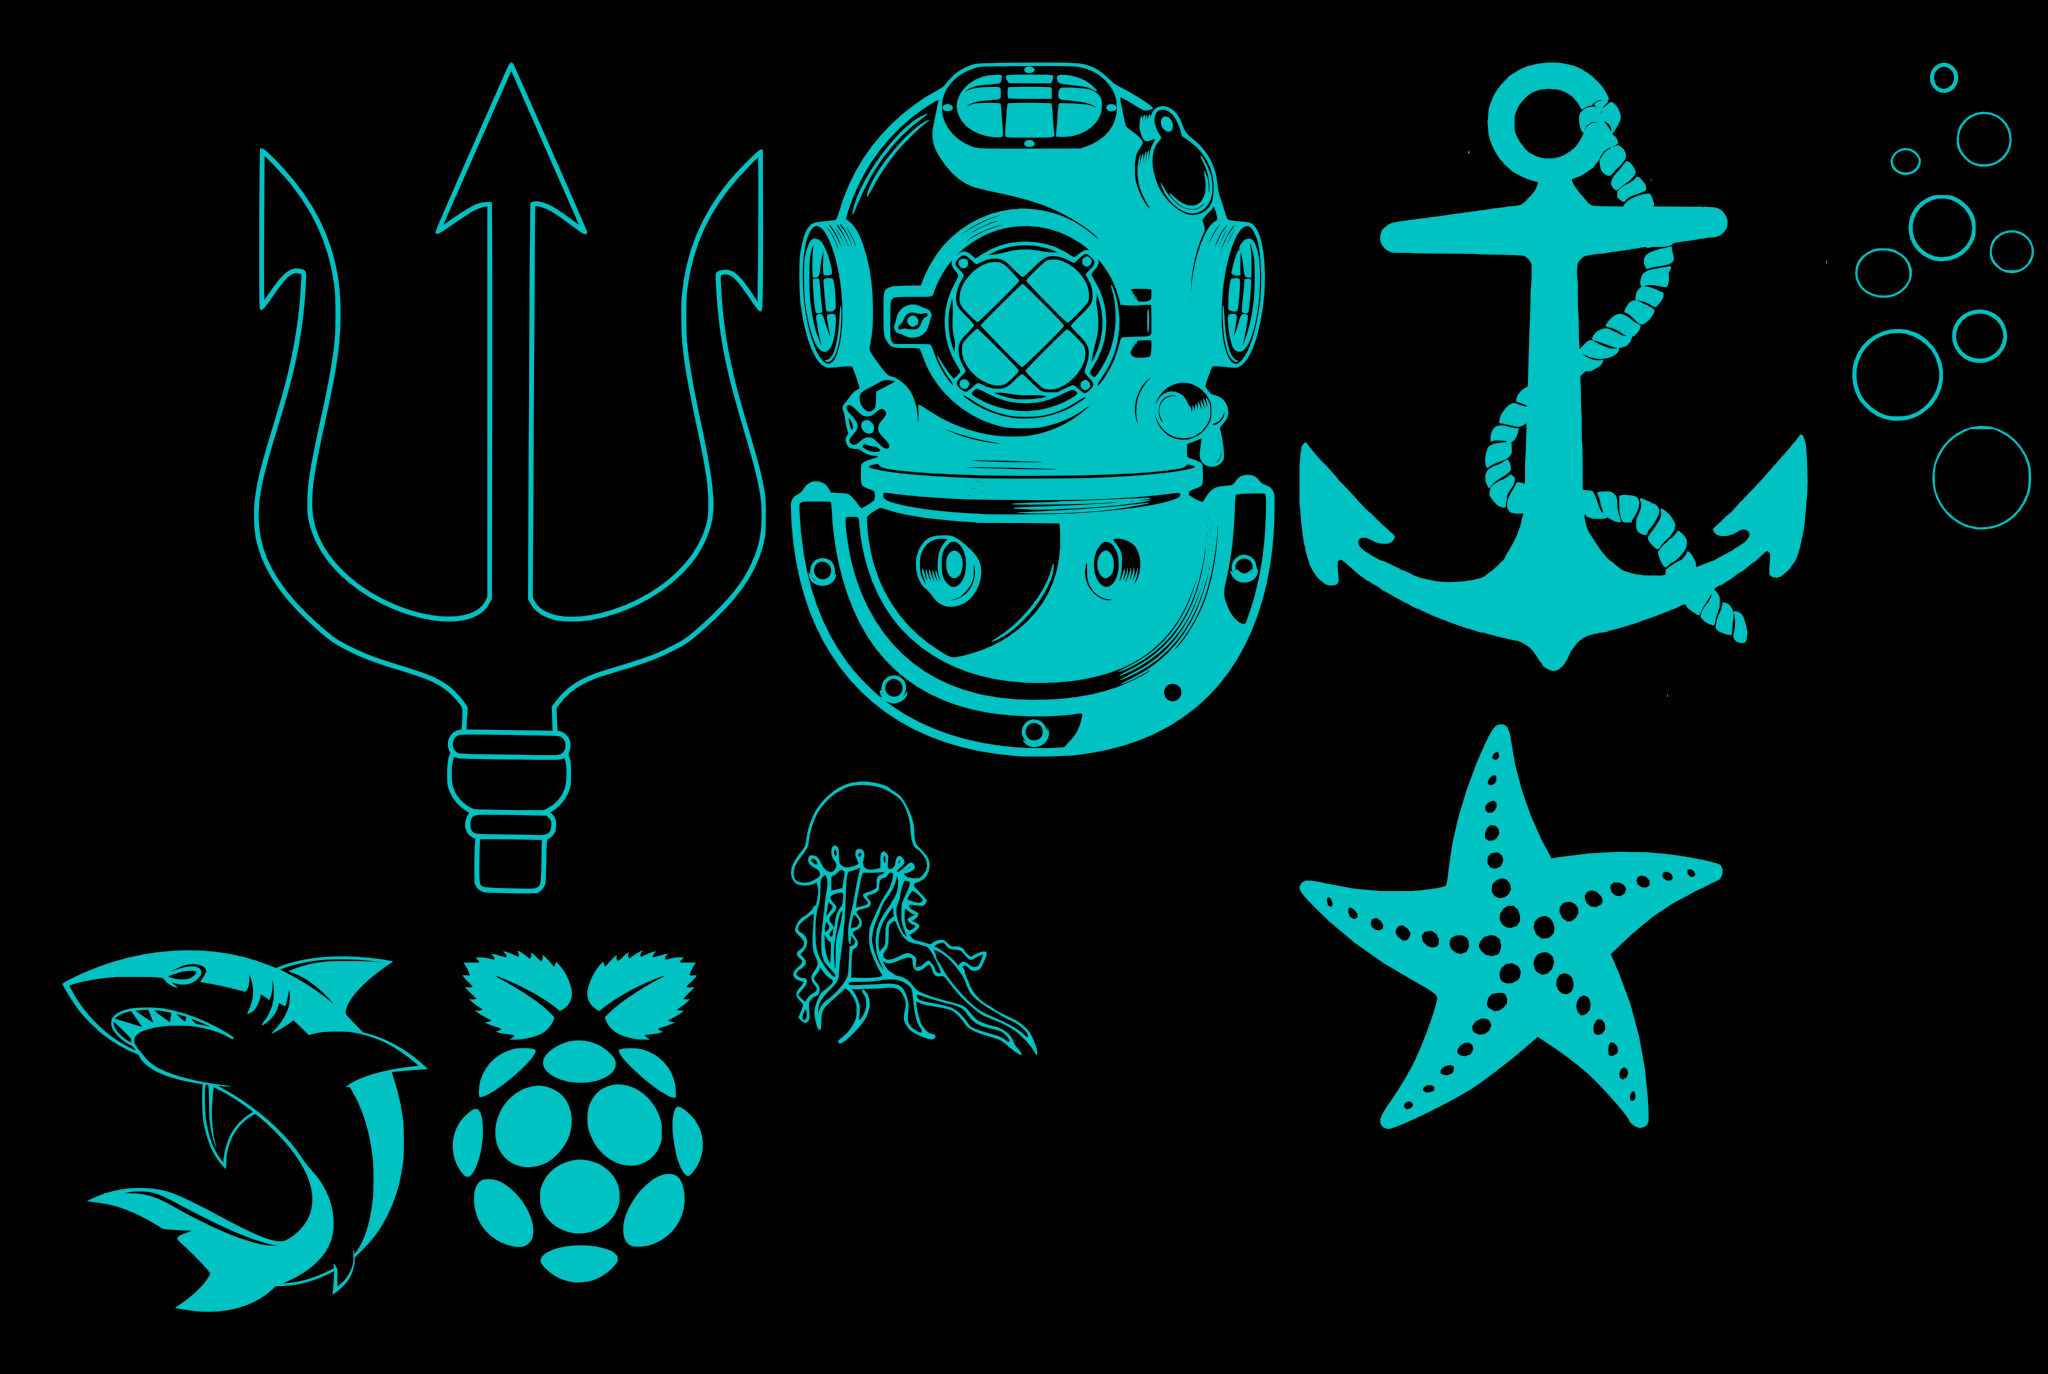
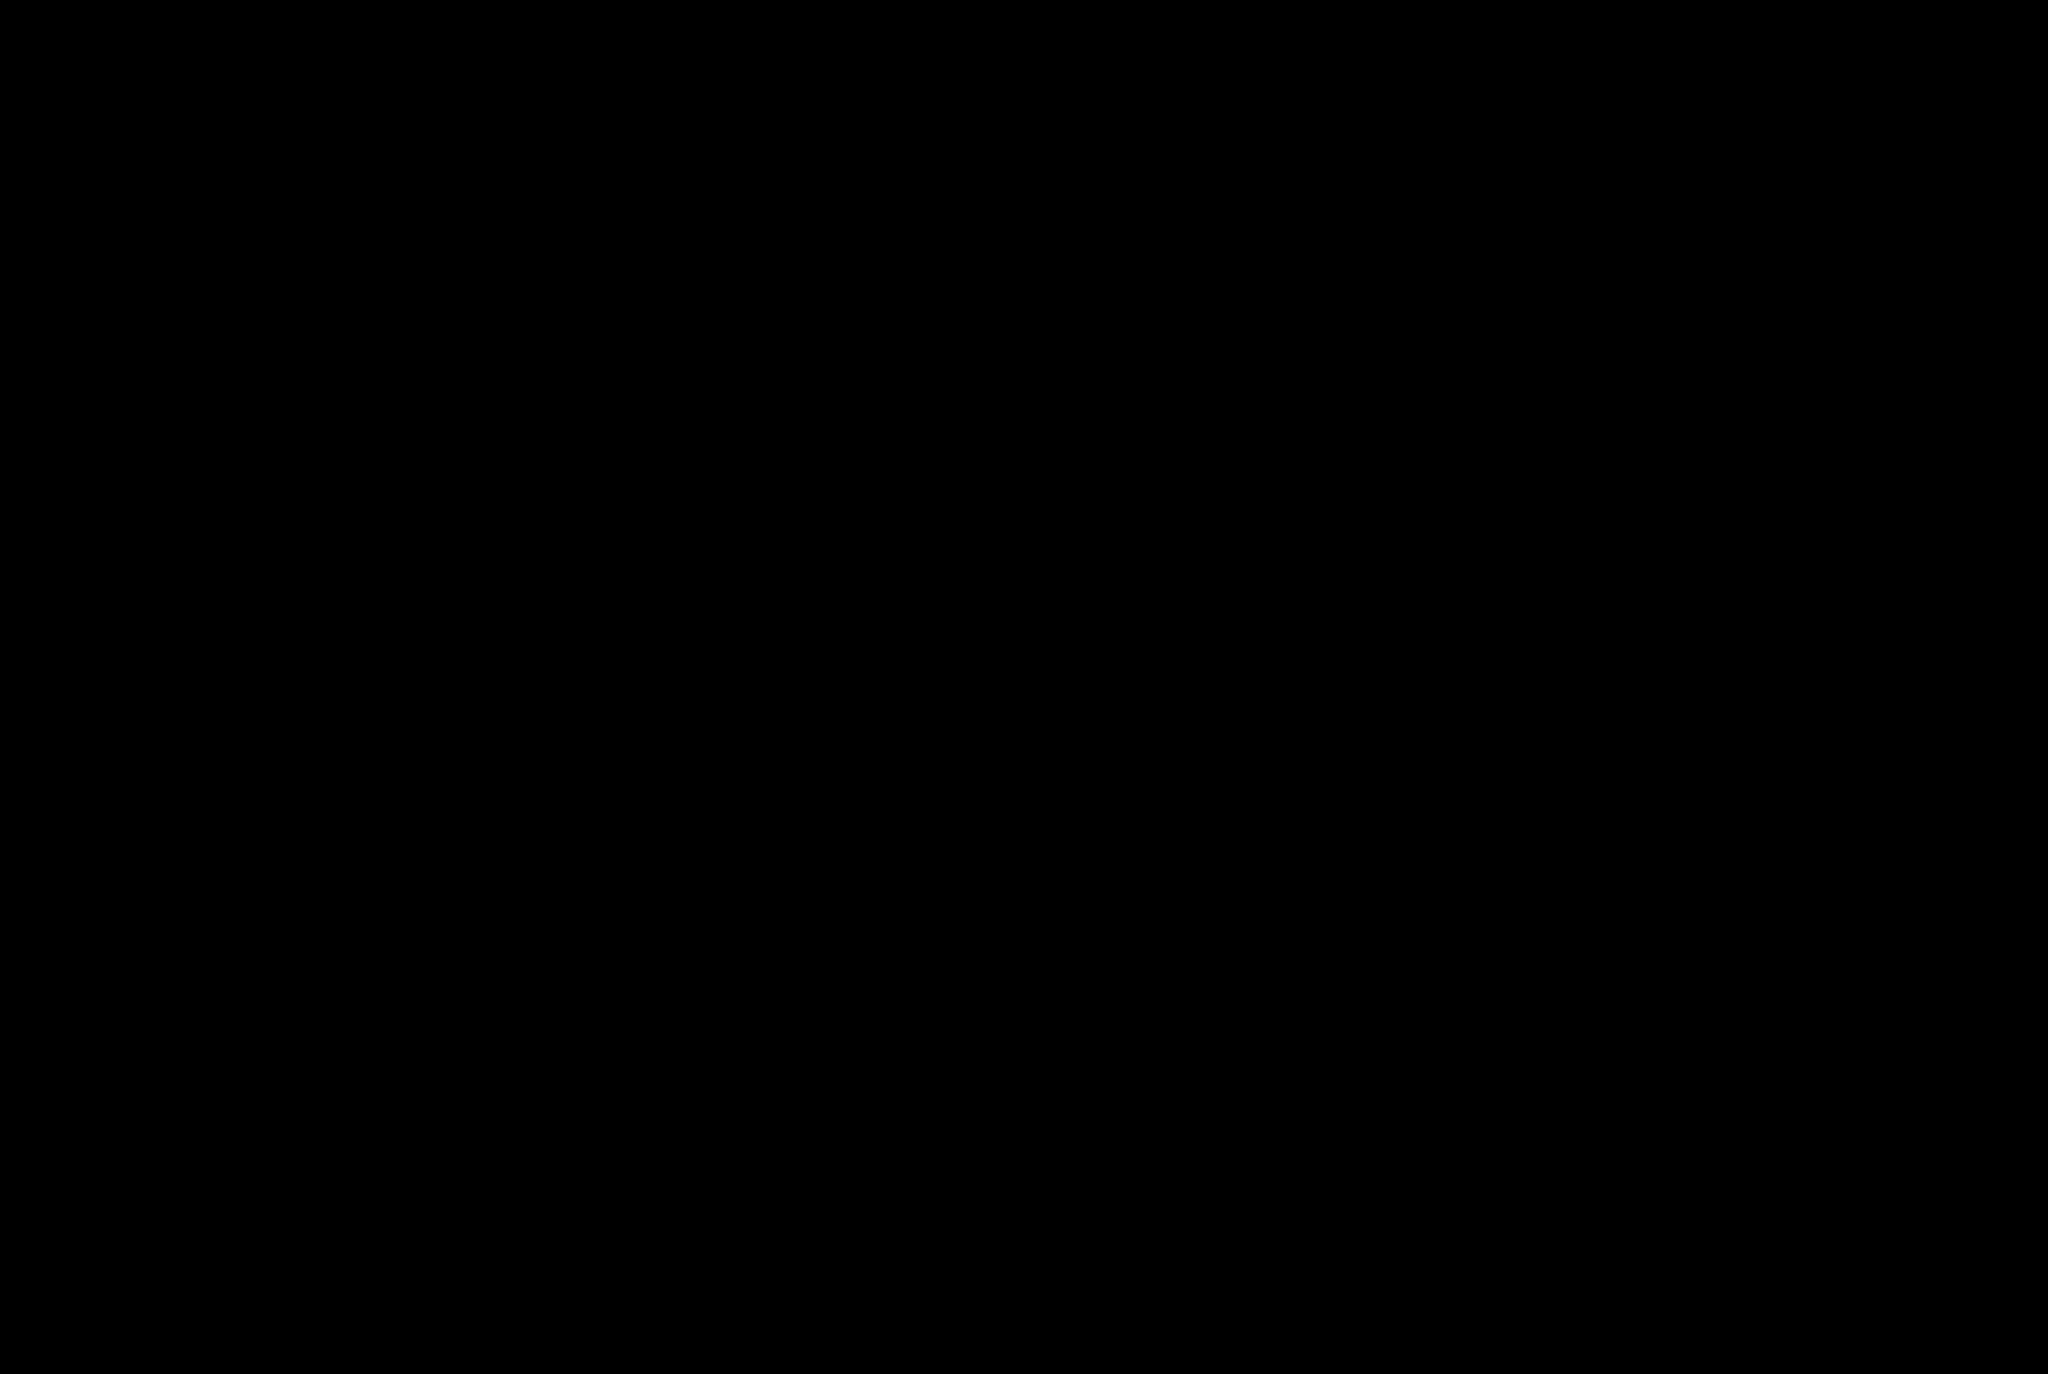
drawing: [253, 62, 2034, 1130] -> none
drawing: [62, 950, 703, 1312] -> none

